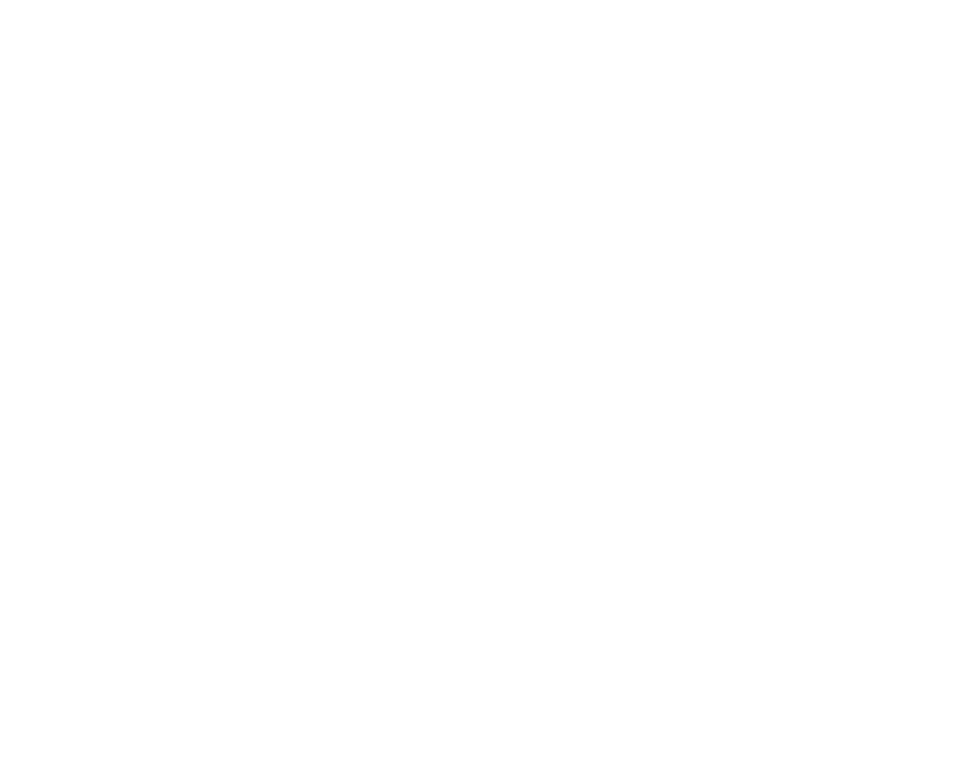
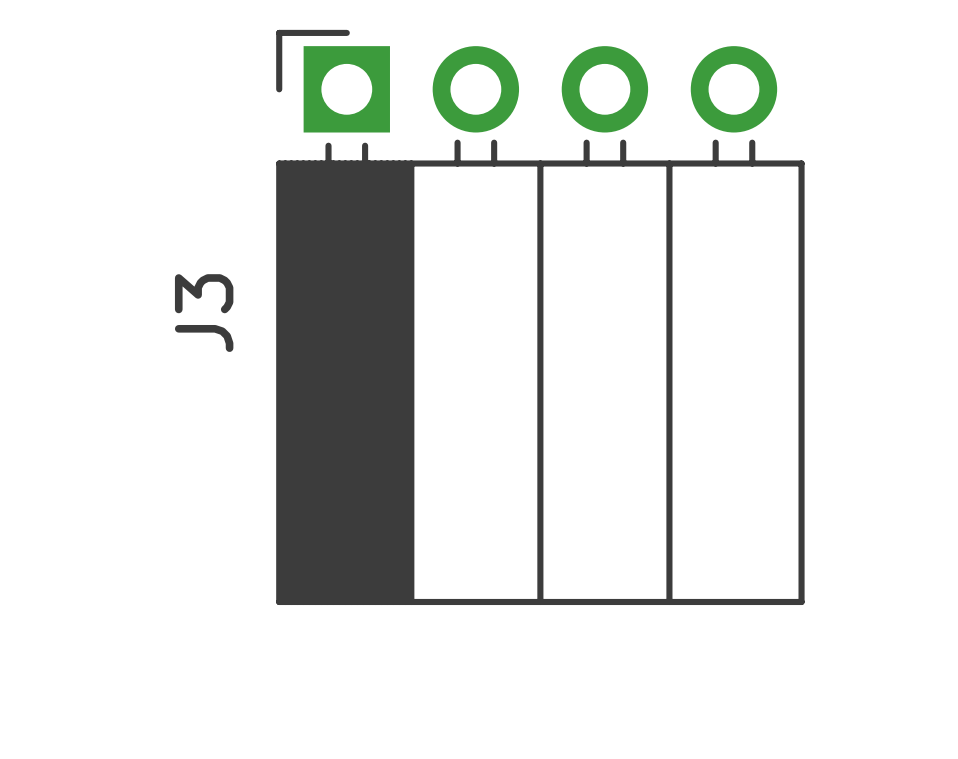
J3: none -> (540, 317)

